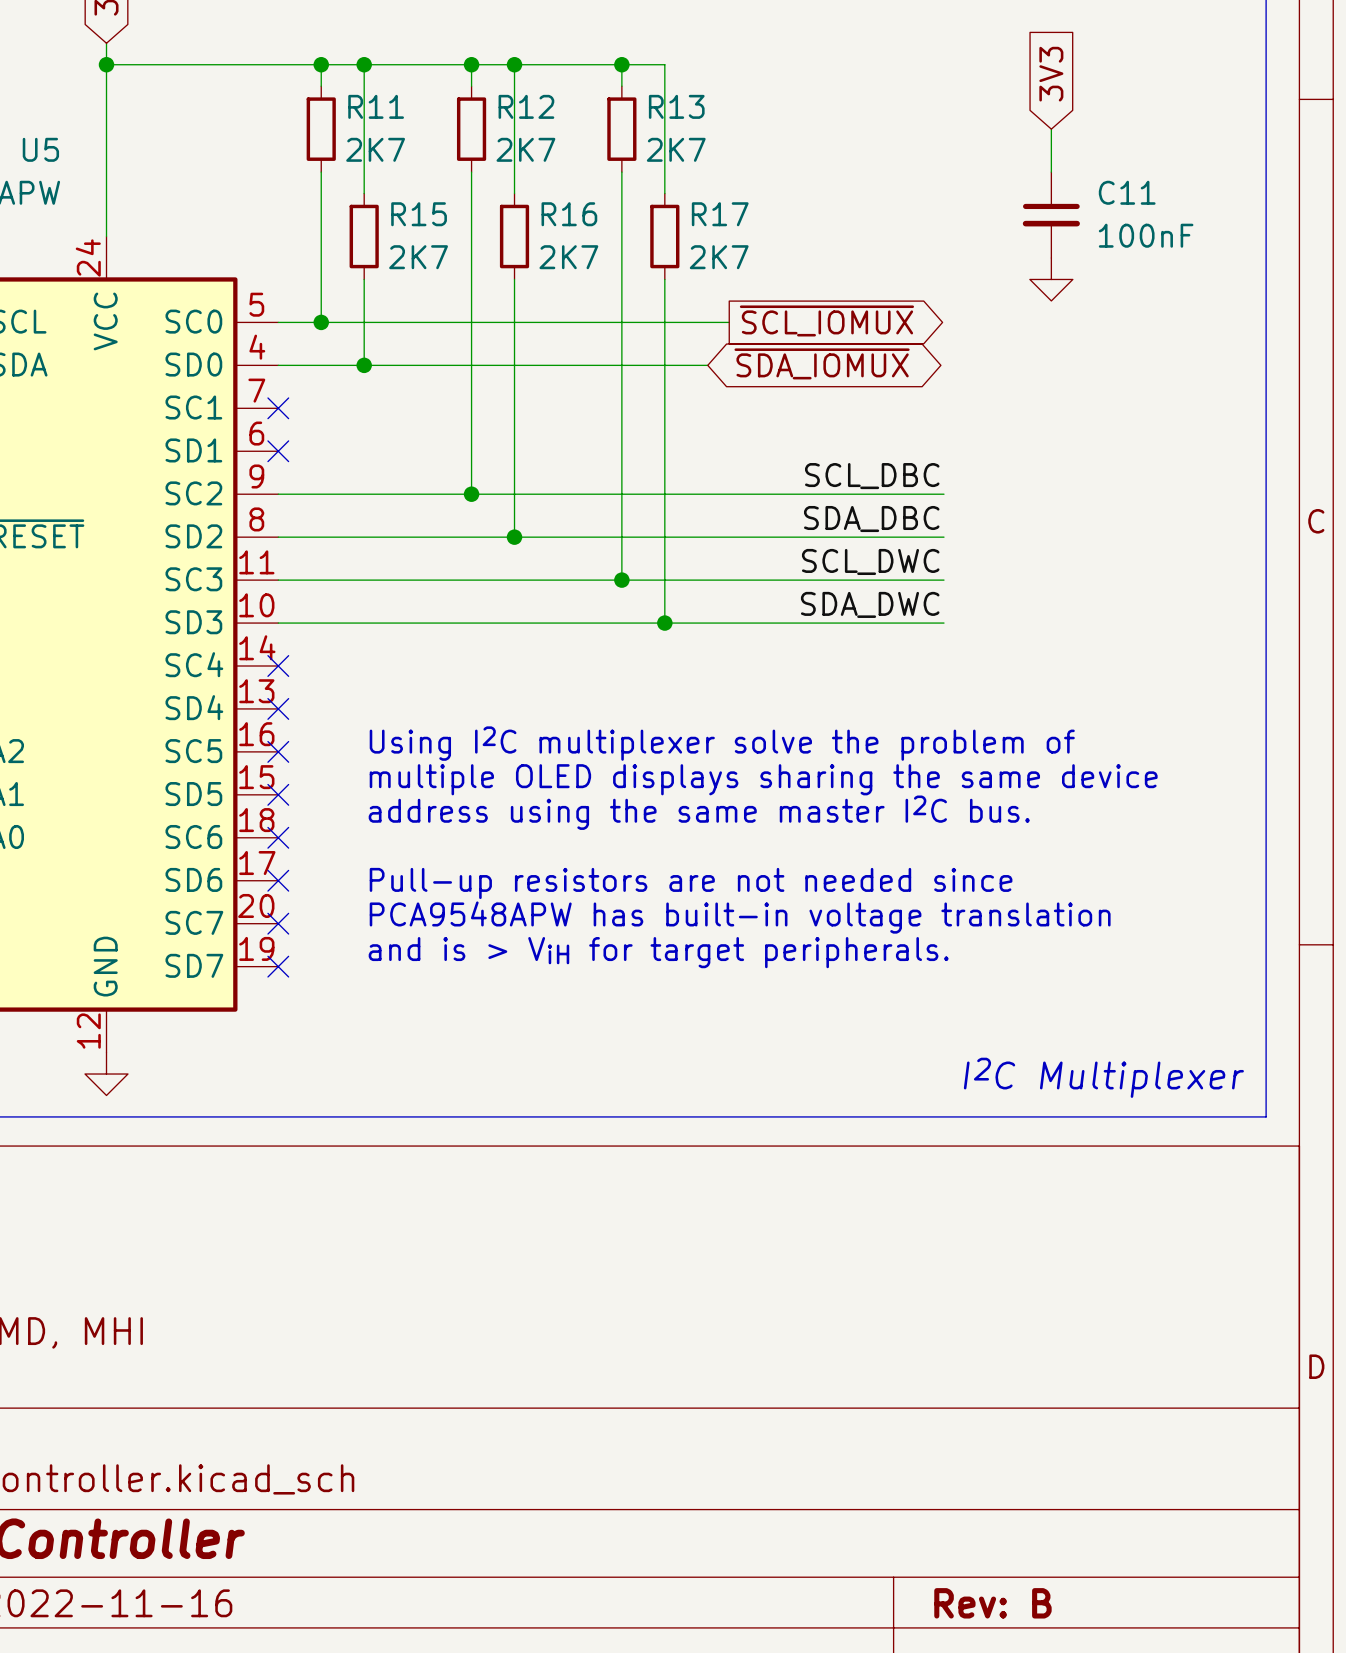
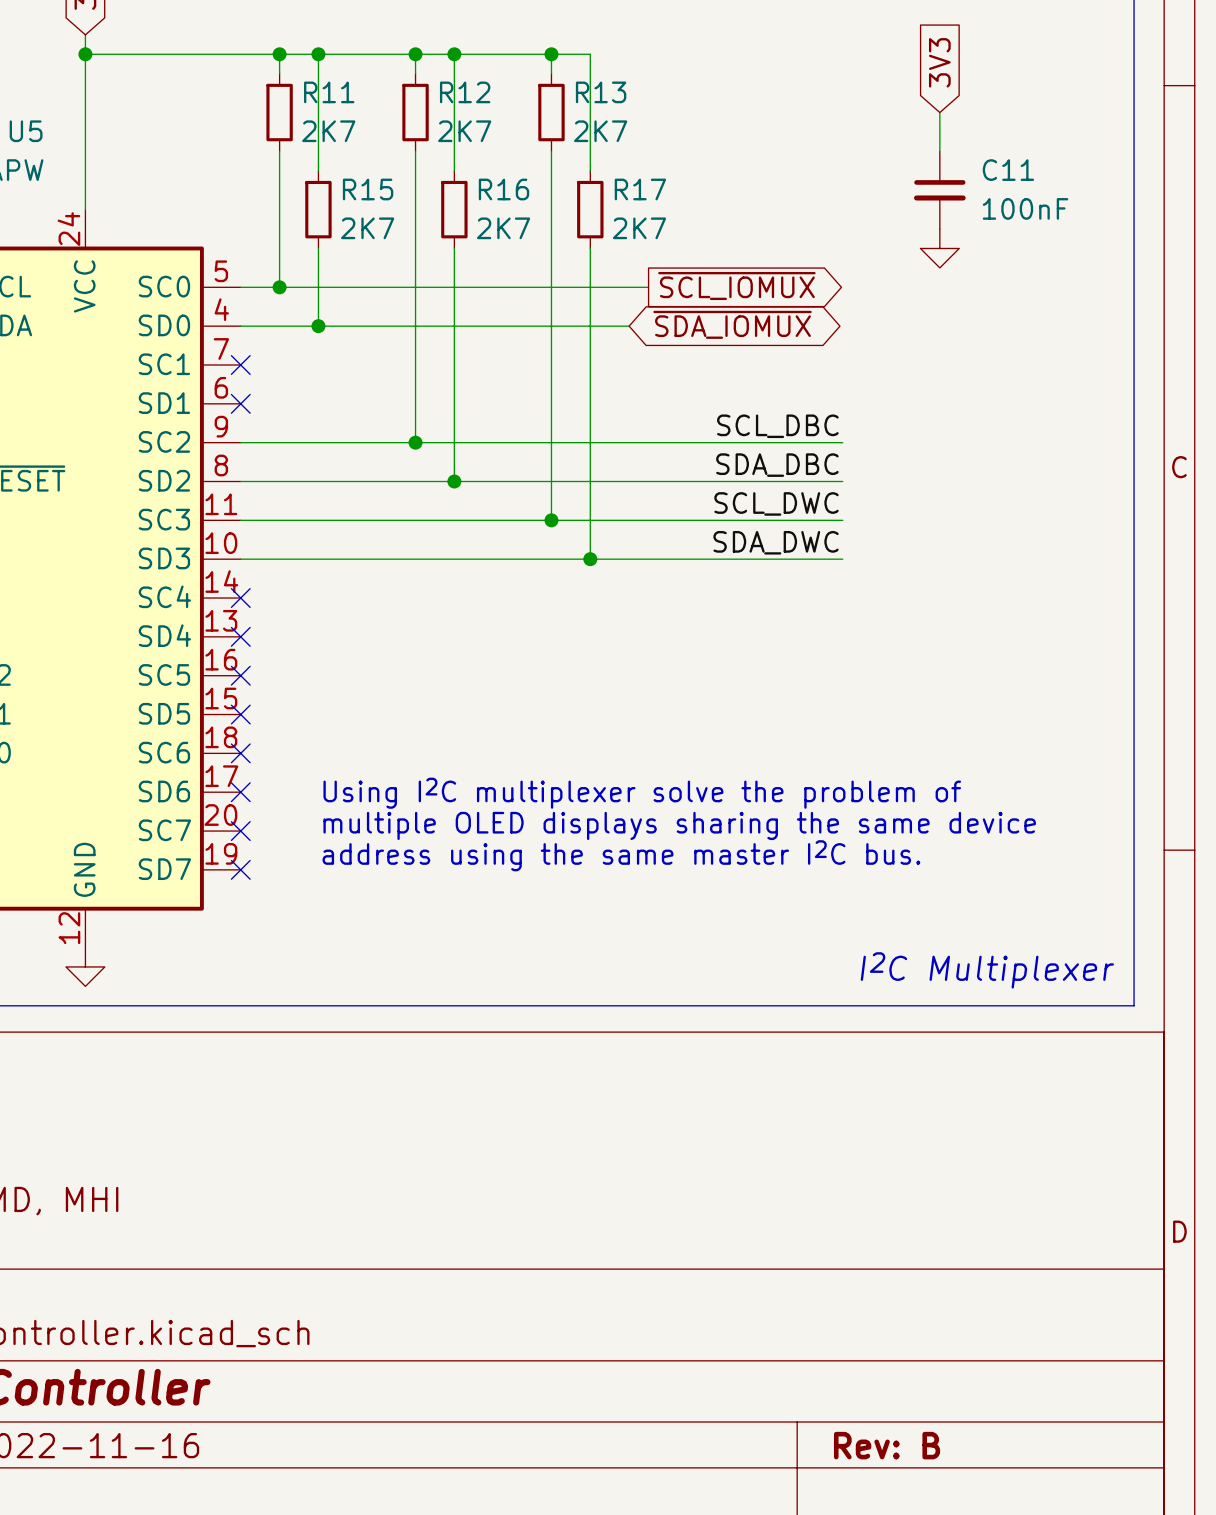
text: Using I2C multiplexer solve the problem of (722, 743) -> none
text: multiple OLED displays sharing the same device (763, 779) -> none
text: address using the same master I2C bus. (699, 812) -> none
text: Pull-up resistors are not needed since (691, 883) -> Using I2C multiplexer solve the problem of (642, 793)
text: PCA9548APW has built-in voltage translation (740, 917) -> multiple OLED displays sharing the same device (679, 825)
text: and is > ViH for target peripherals. (658, 952) -> address using the same master I2C bus. (621, 855)

